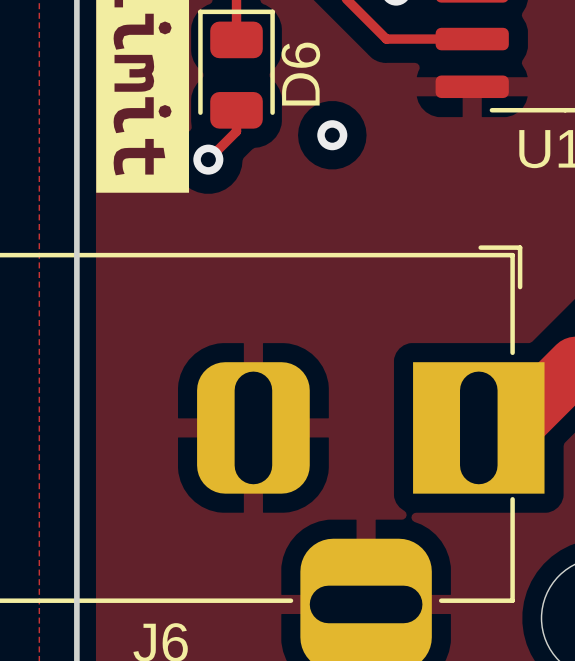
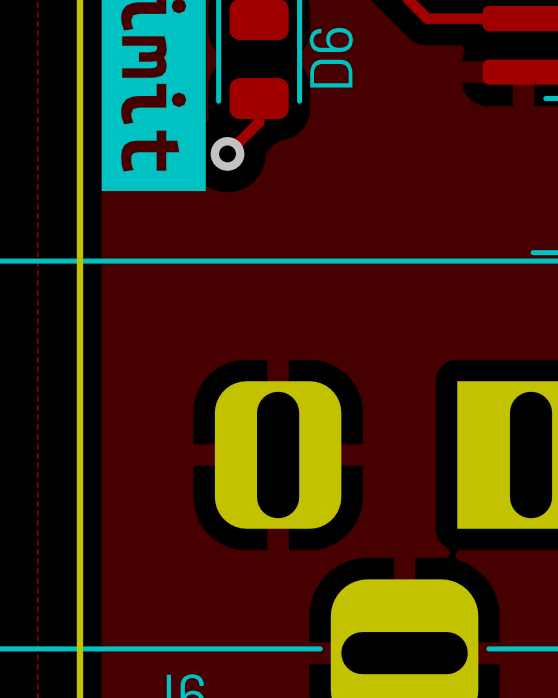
via: (332, 135) -> none

